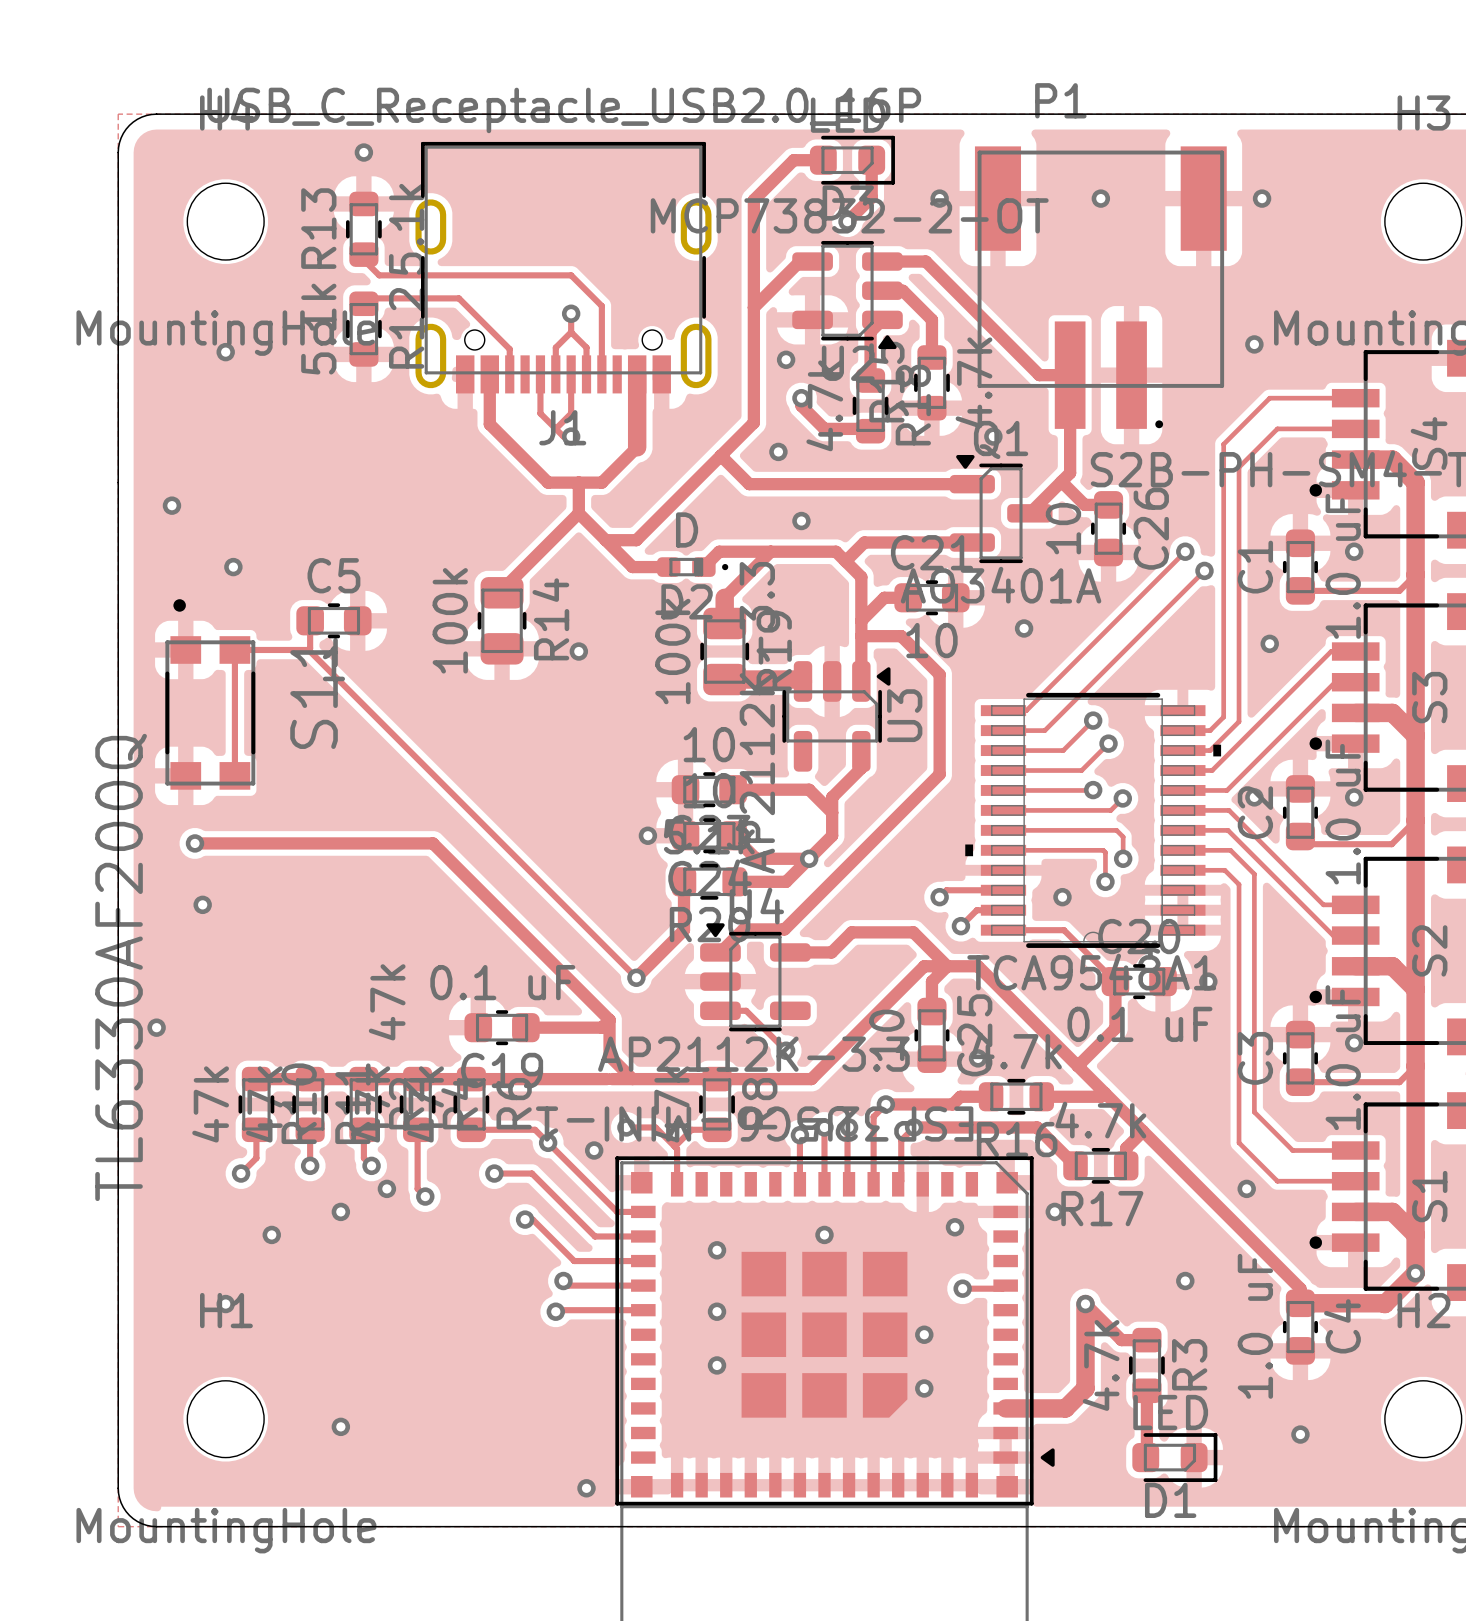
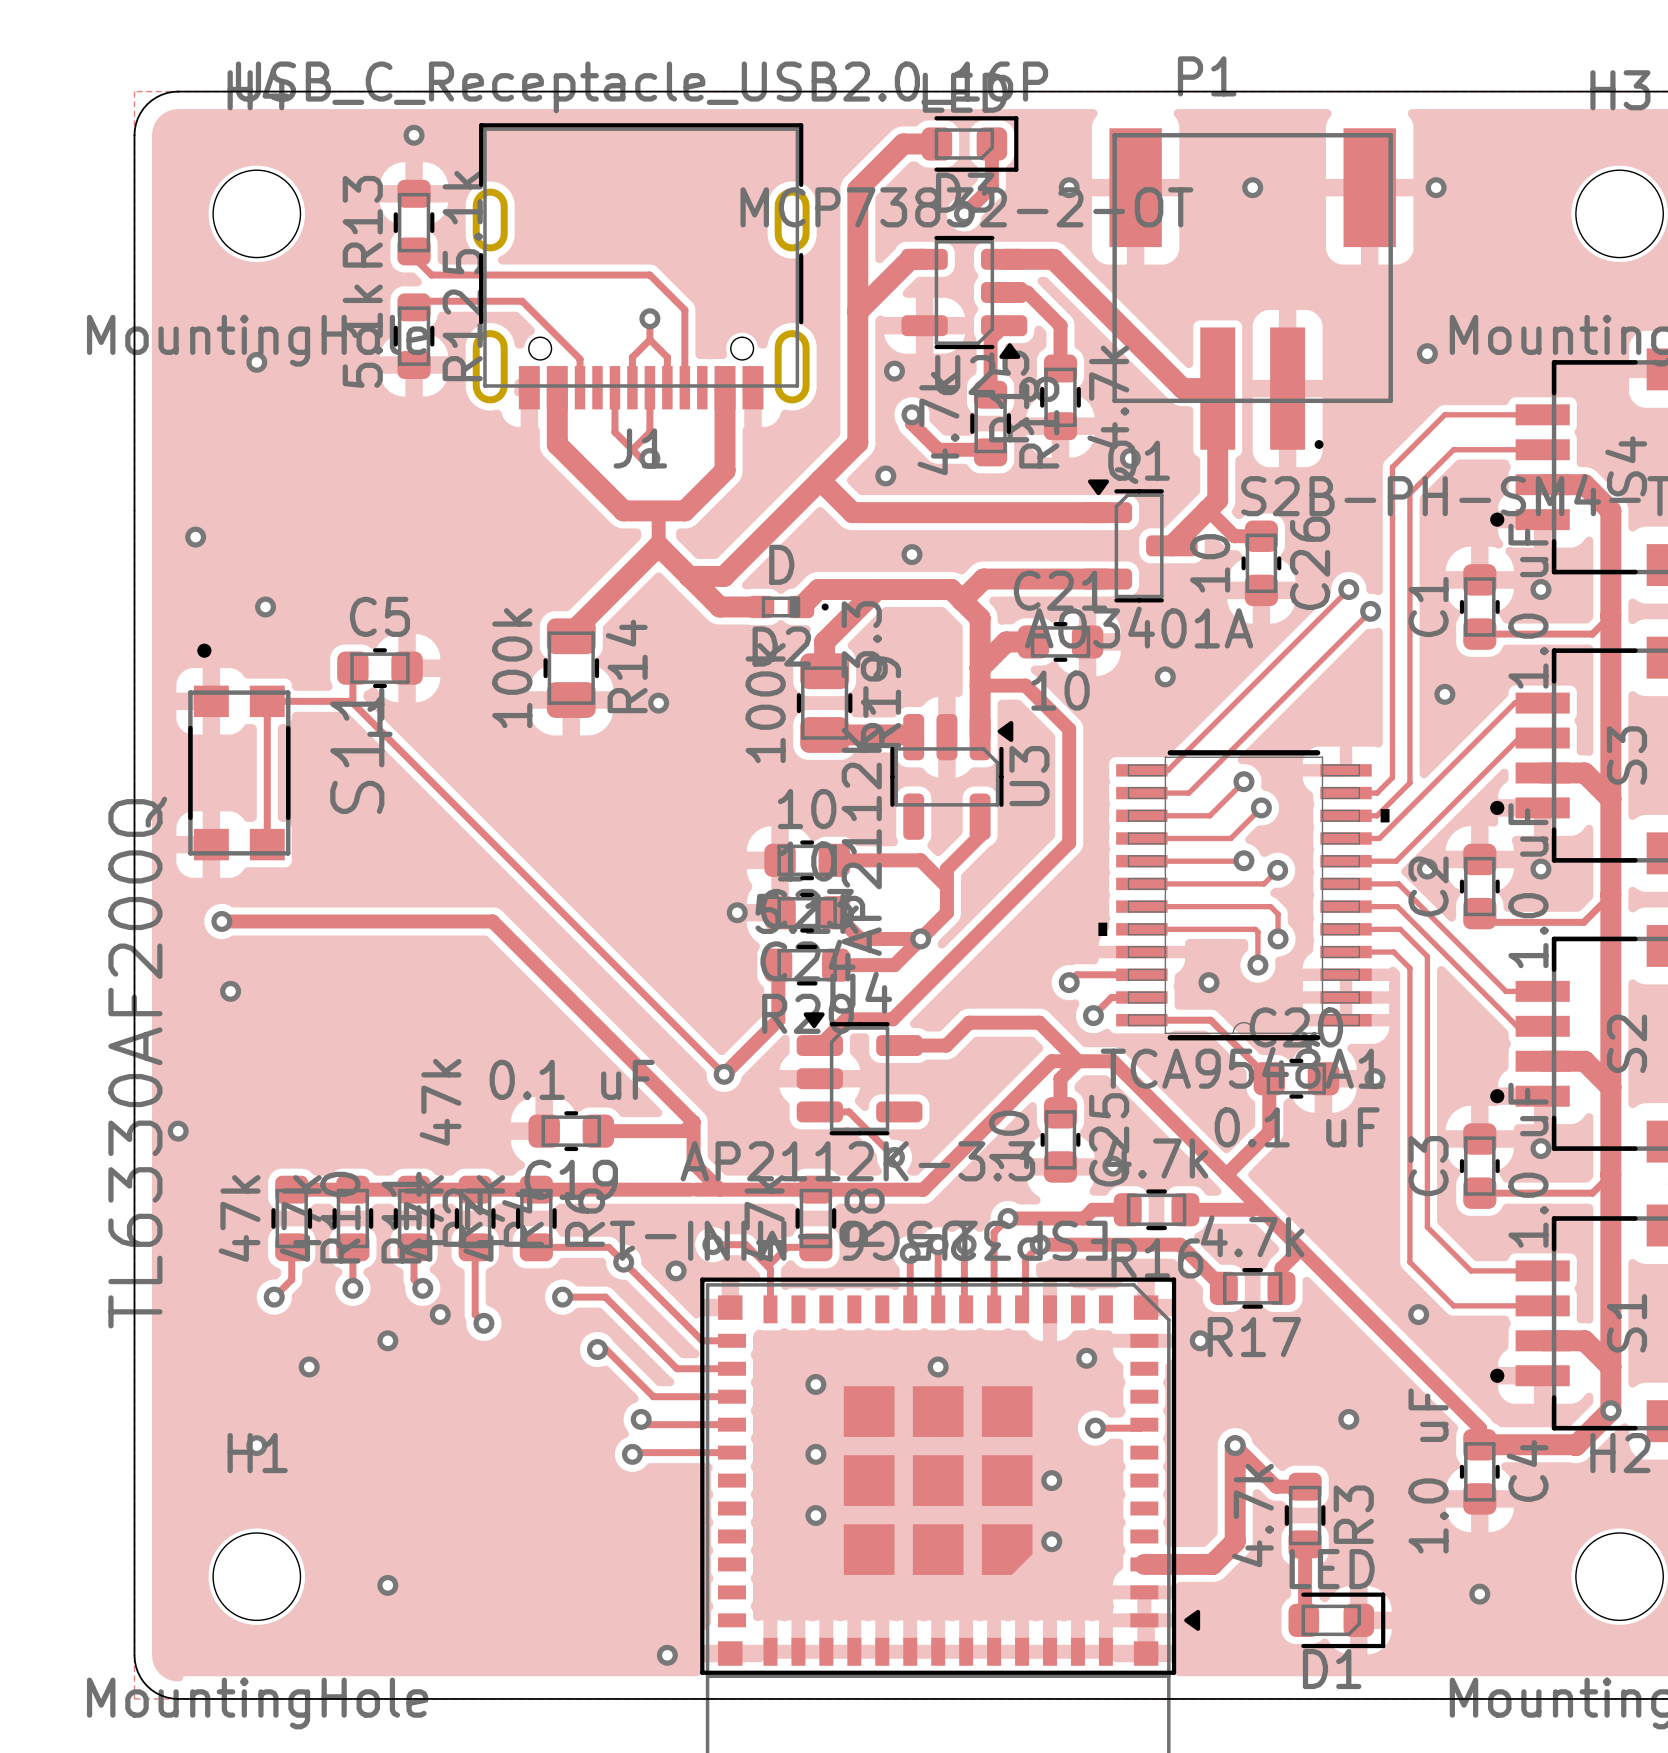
track width: thin (823, 160) (793, 160) (753, 200) (753, 422) (636, 540) (605, 540) -> thick (936, 143) (903, 143) (857, 189) (857, 442) (724, 576) (689, 576)
track width: thin (812, 261) (799, 261) (753, 307) -> thick (924, 259) (910, 259) (857, 311)
track width: thin (882, 261) (925, 261) (1039, 375) (1070, 375) (1070, 473) (1029, 513) -> thick (1004, 259) (1053, 259) (1182, 388) (1217, 388) (1217, 499) (1171, 545)
track width: thin (489, 374) (489, 424) (548, 482) (601, 482) (637, 447) -> thick (557, 387) (557, 444) (623, 510) (684, 510) (725, 470)
track width: thin (720, 455) (749, 484) (972, 484) -> thick (820, 480) (852, 512) (1106, 512)
track width: thin (972, 542) (864, 542) (845, 561) -> thick (1106, 579) (983, 579) (962, 600)
track width: thin (770, 551) (724, 597) -> thick (877, 589) (824, 641)
track width: thin (668, 567) (632, 567) (578, 513) (502, 590) -> thick (760, 606) (719, 606) (658, 545) (571, 633)
track width: thin (703, 567) (719, 551) (836, 551) (861, 577) (861, 681) -> thick (800, 606) (818, 589) (951, 589) (980, 618) (980, 737)
track width: thin (908, 597) (884, 597) (861, 620) -> thick (1033, 641) (1006, 641) (980, 668)

